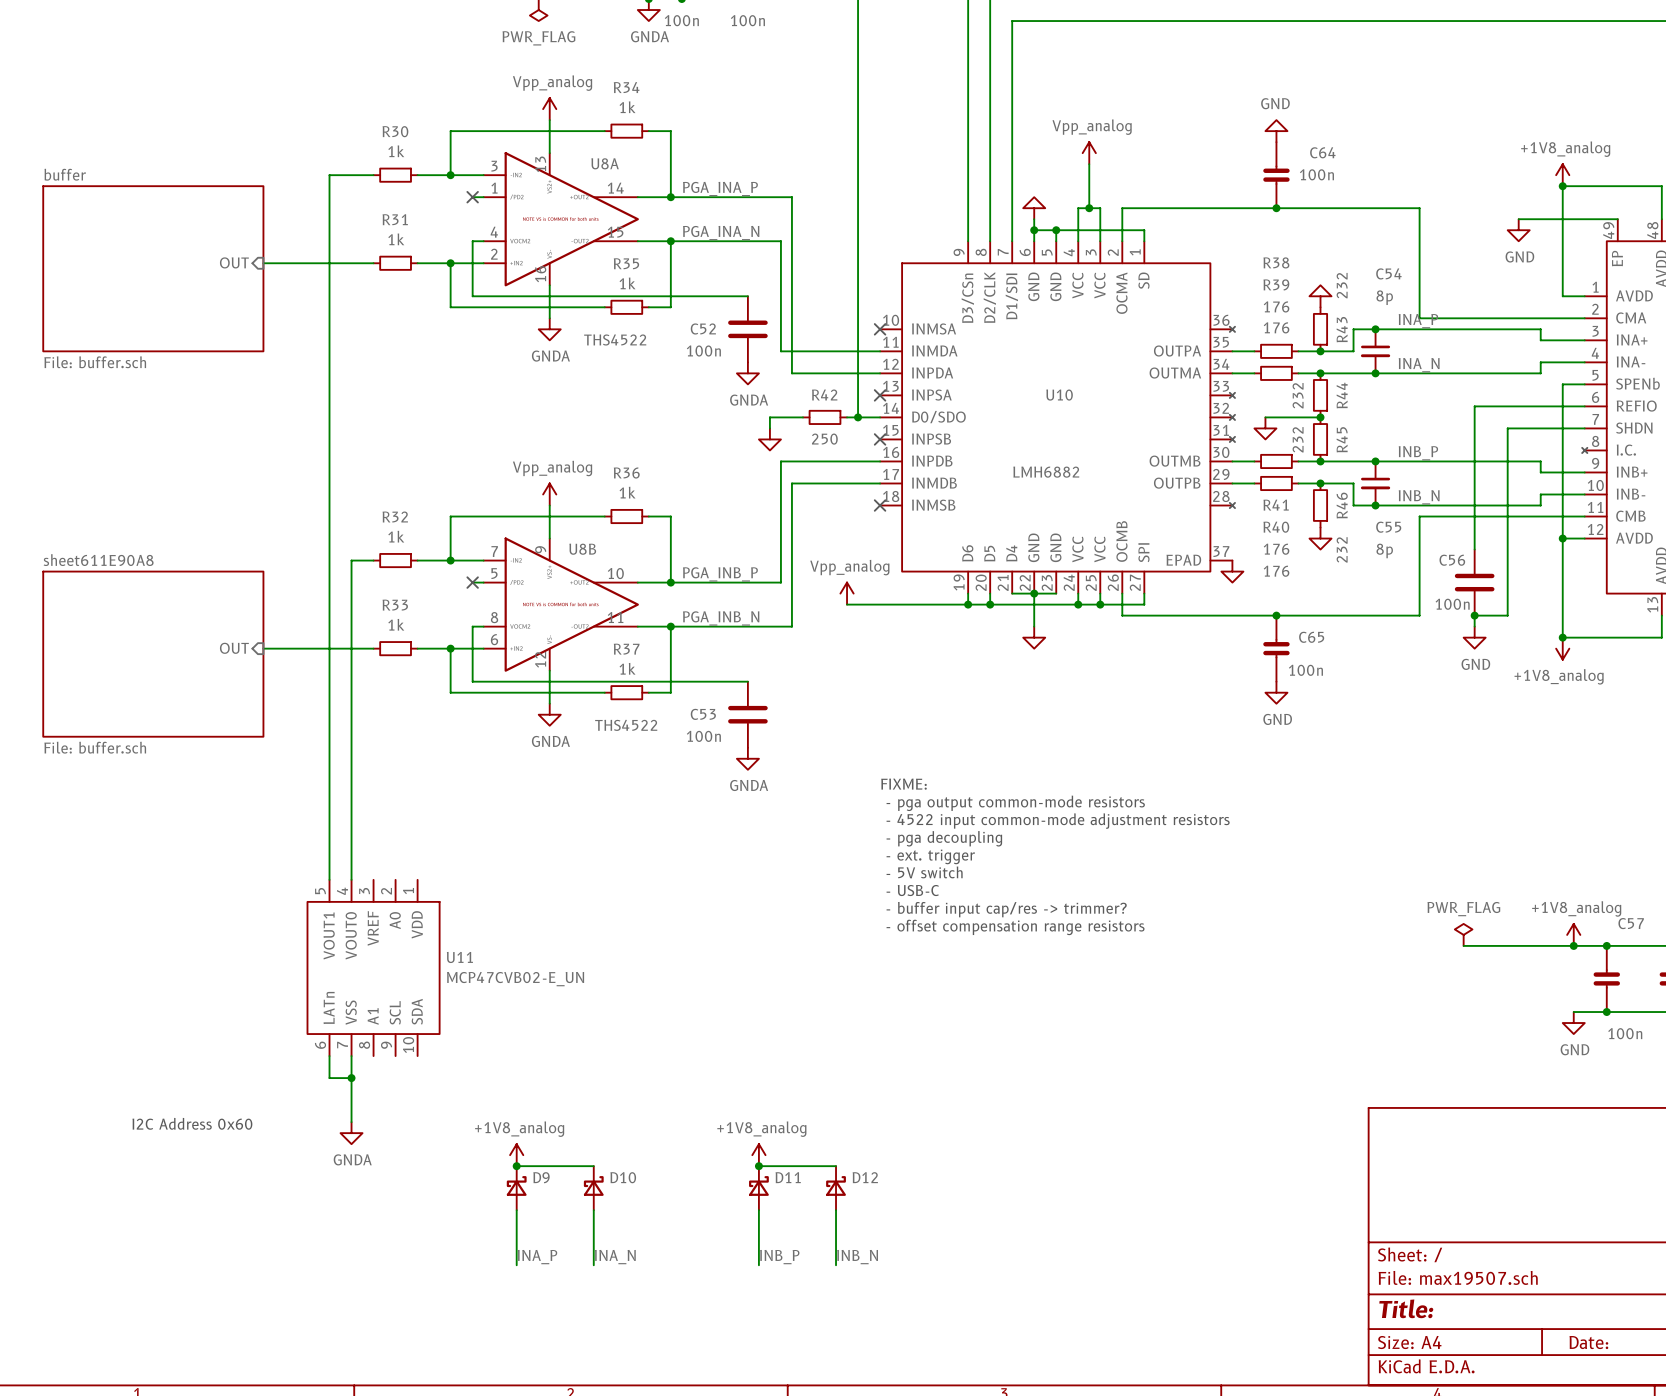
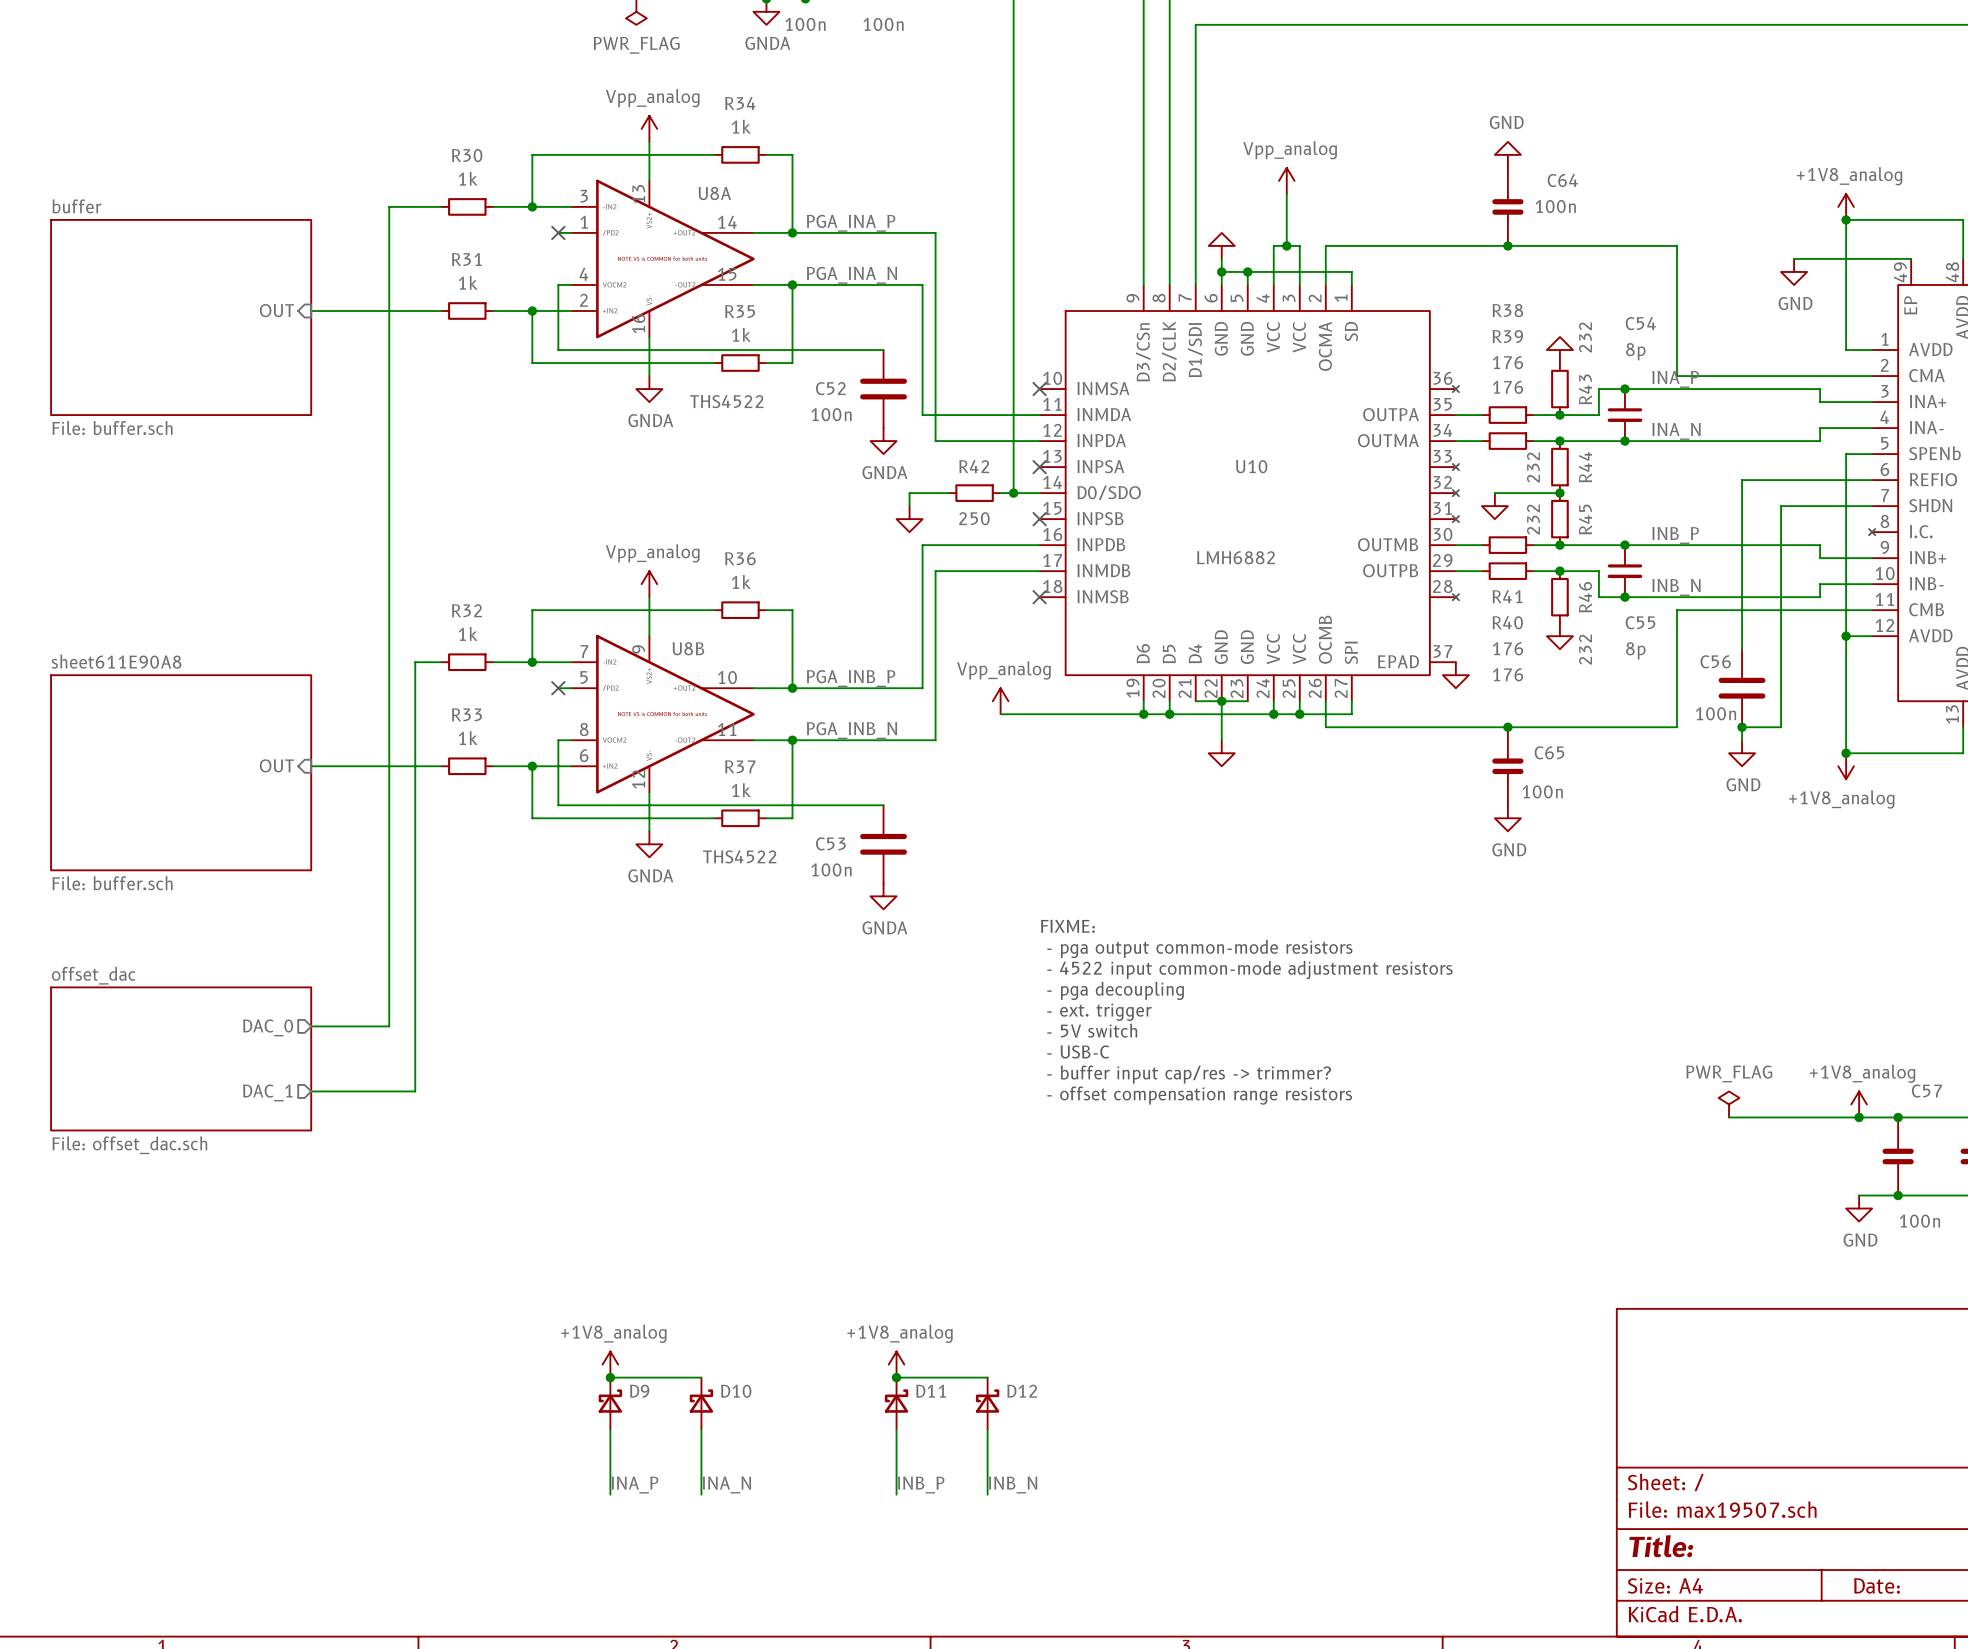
wire: (329, 868) (329, 879) -> (389, 1026) (311, 1026)
sheet pin: none -> DAC_0 (268, 1027)
wire: none -> (415, 1039) (415, 1091) (311, 1091)
sheet offset_dac: none -> File: offset_dac.sch (181, 1058)
sheet pin: none -> DAC_1 (267, 1092)
U11: MCP47CVB02-E_UN (373, 967) -> none
wire: (329, 1056) (329, 1078) (351, 1078) -> none
wire: (351, 1056) (351, 1122) -> none
junction: (351, 1078) -> none
text: I2C Address 0x60 (192, 1123) -> none
power symbol: GNDA (351, 1133) -> none

